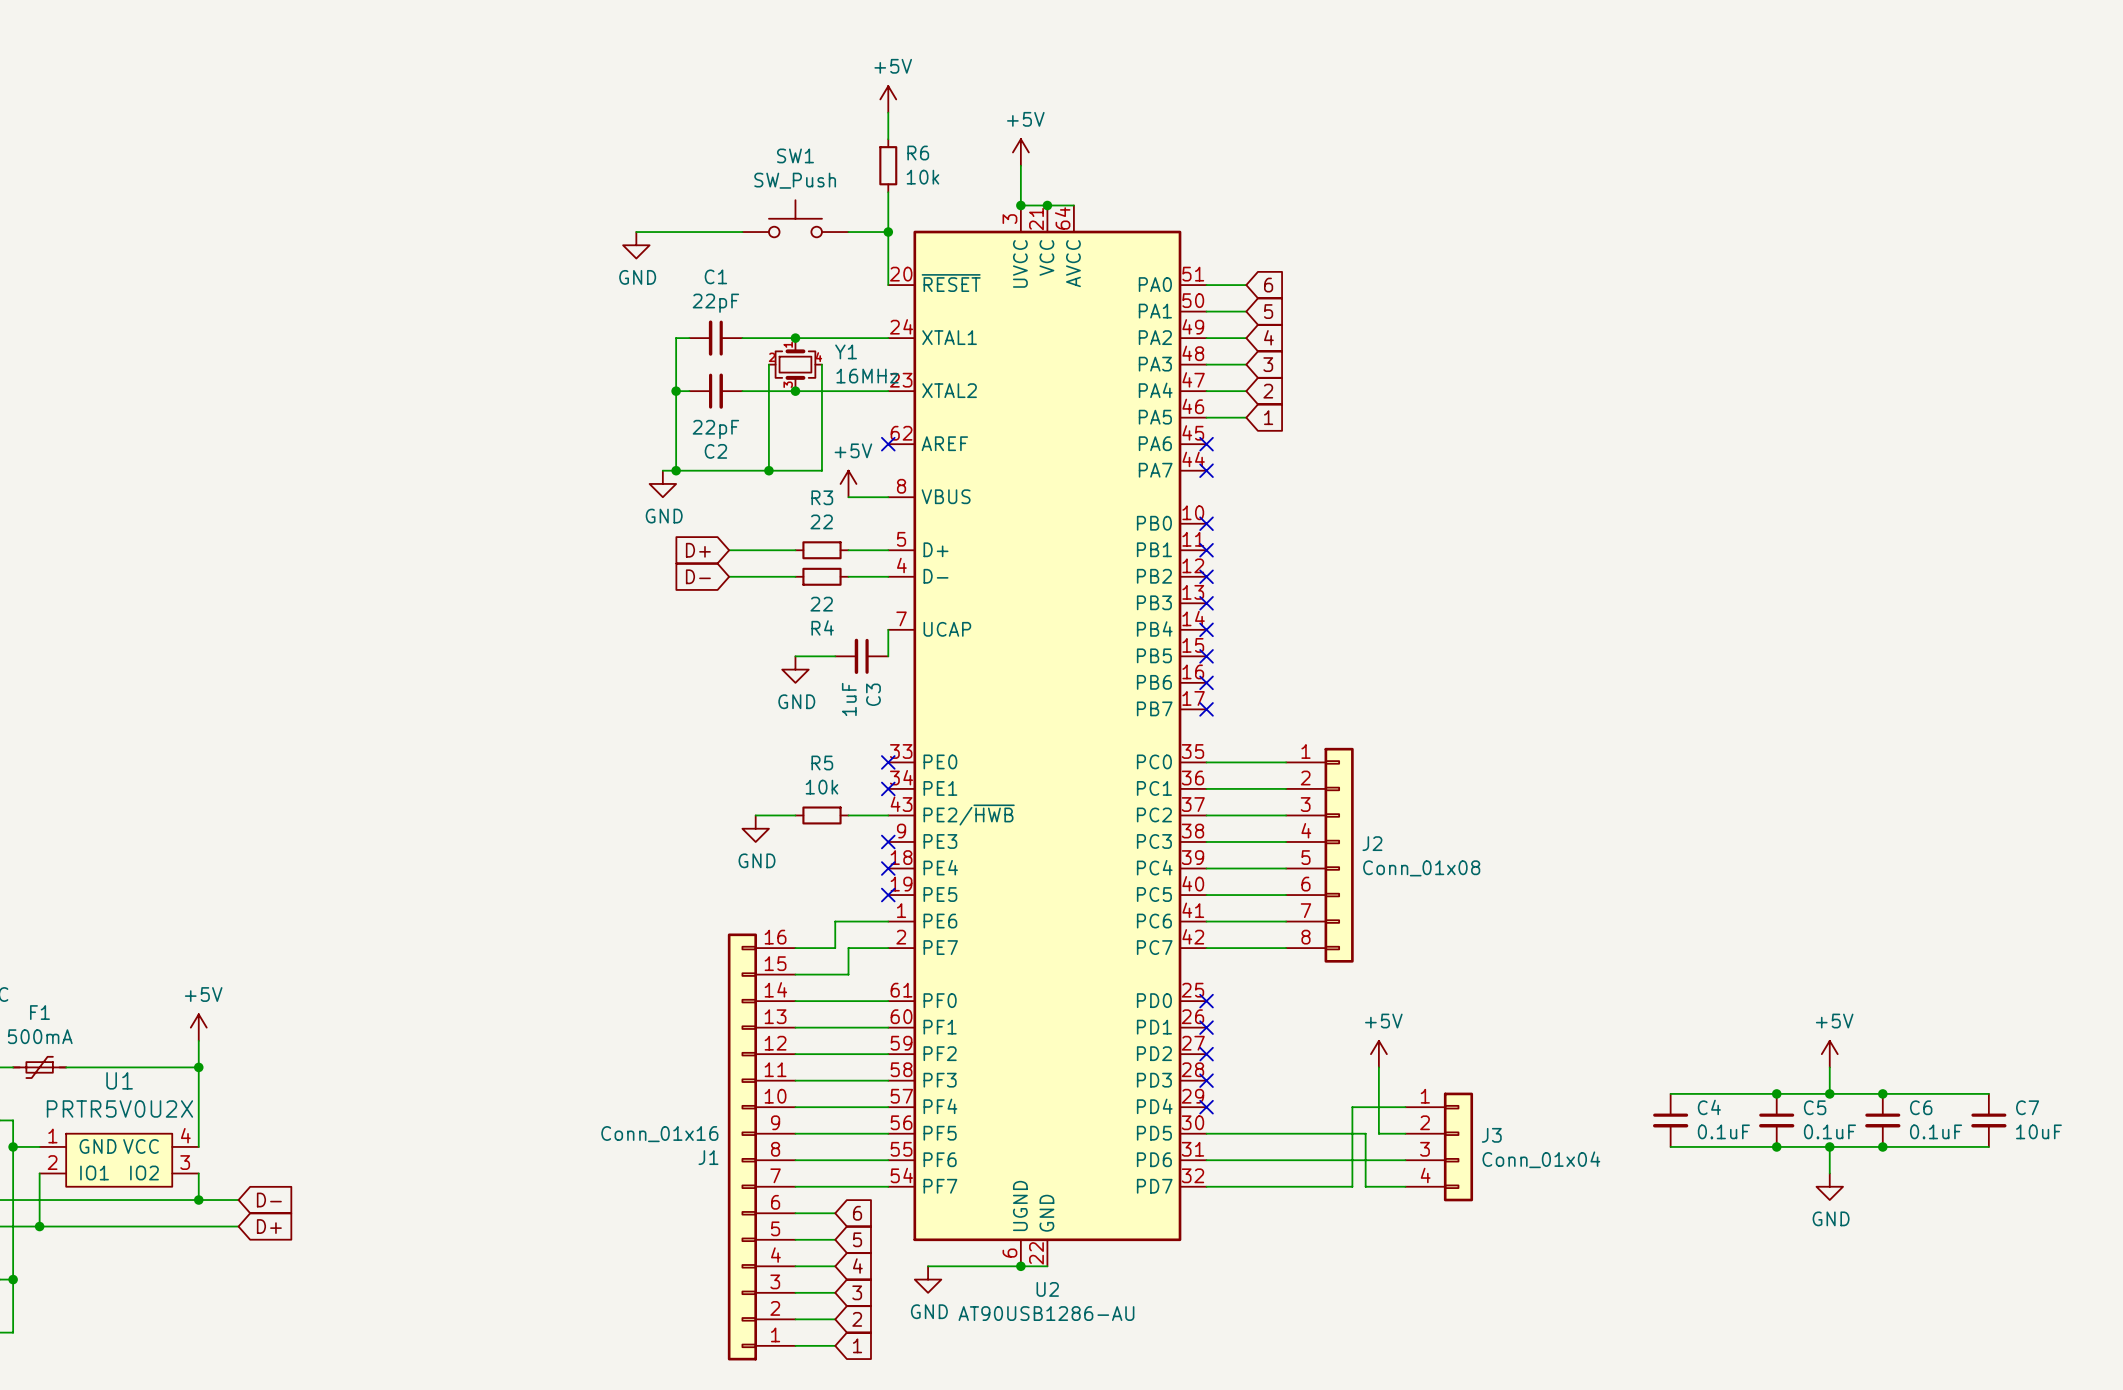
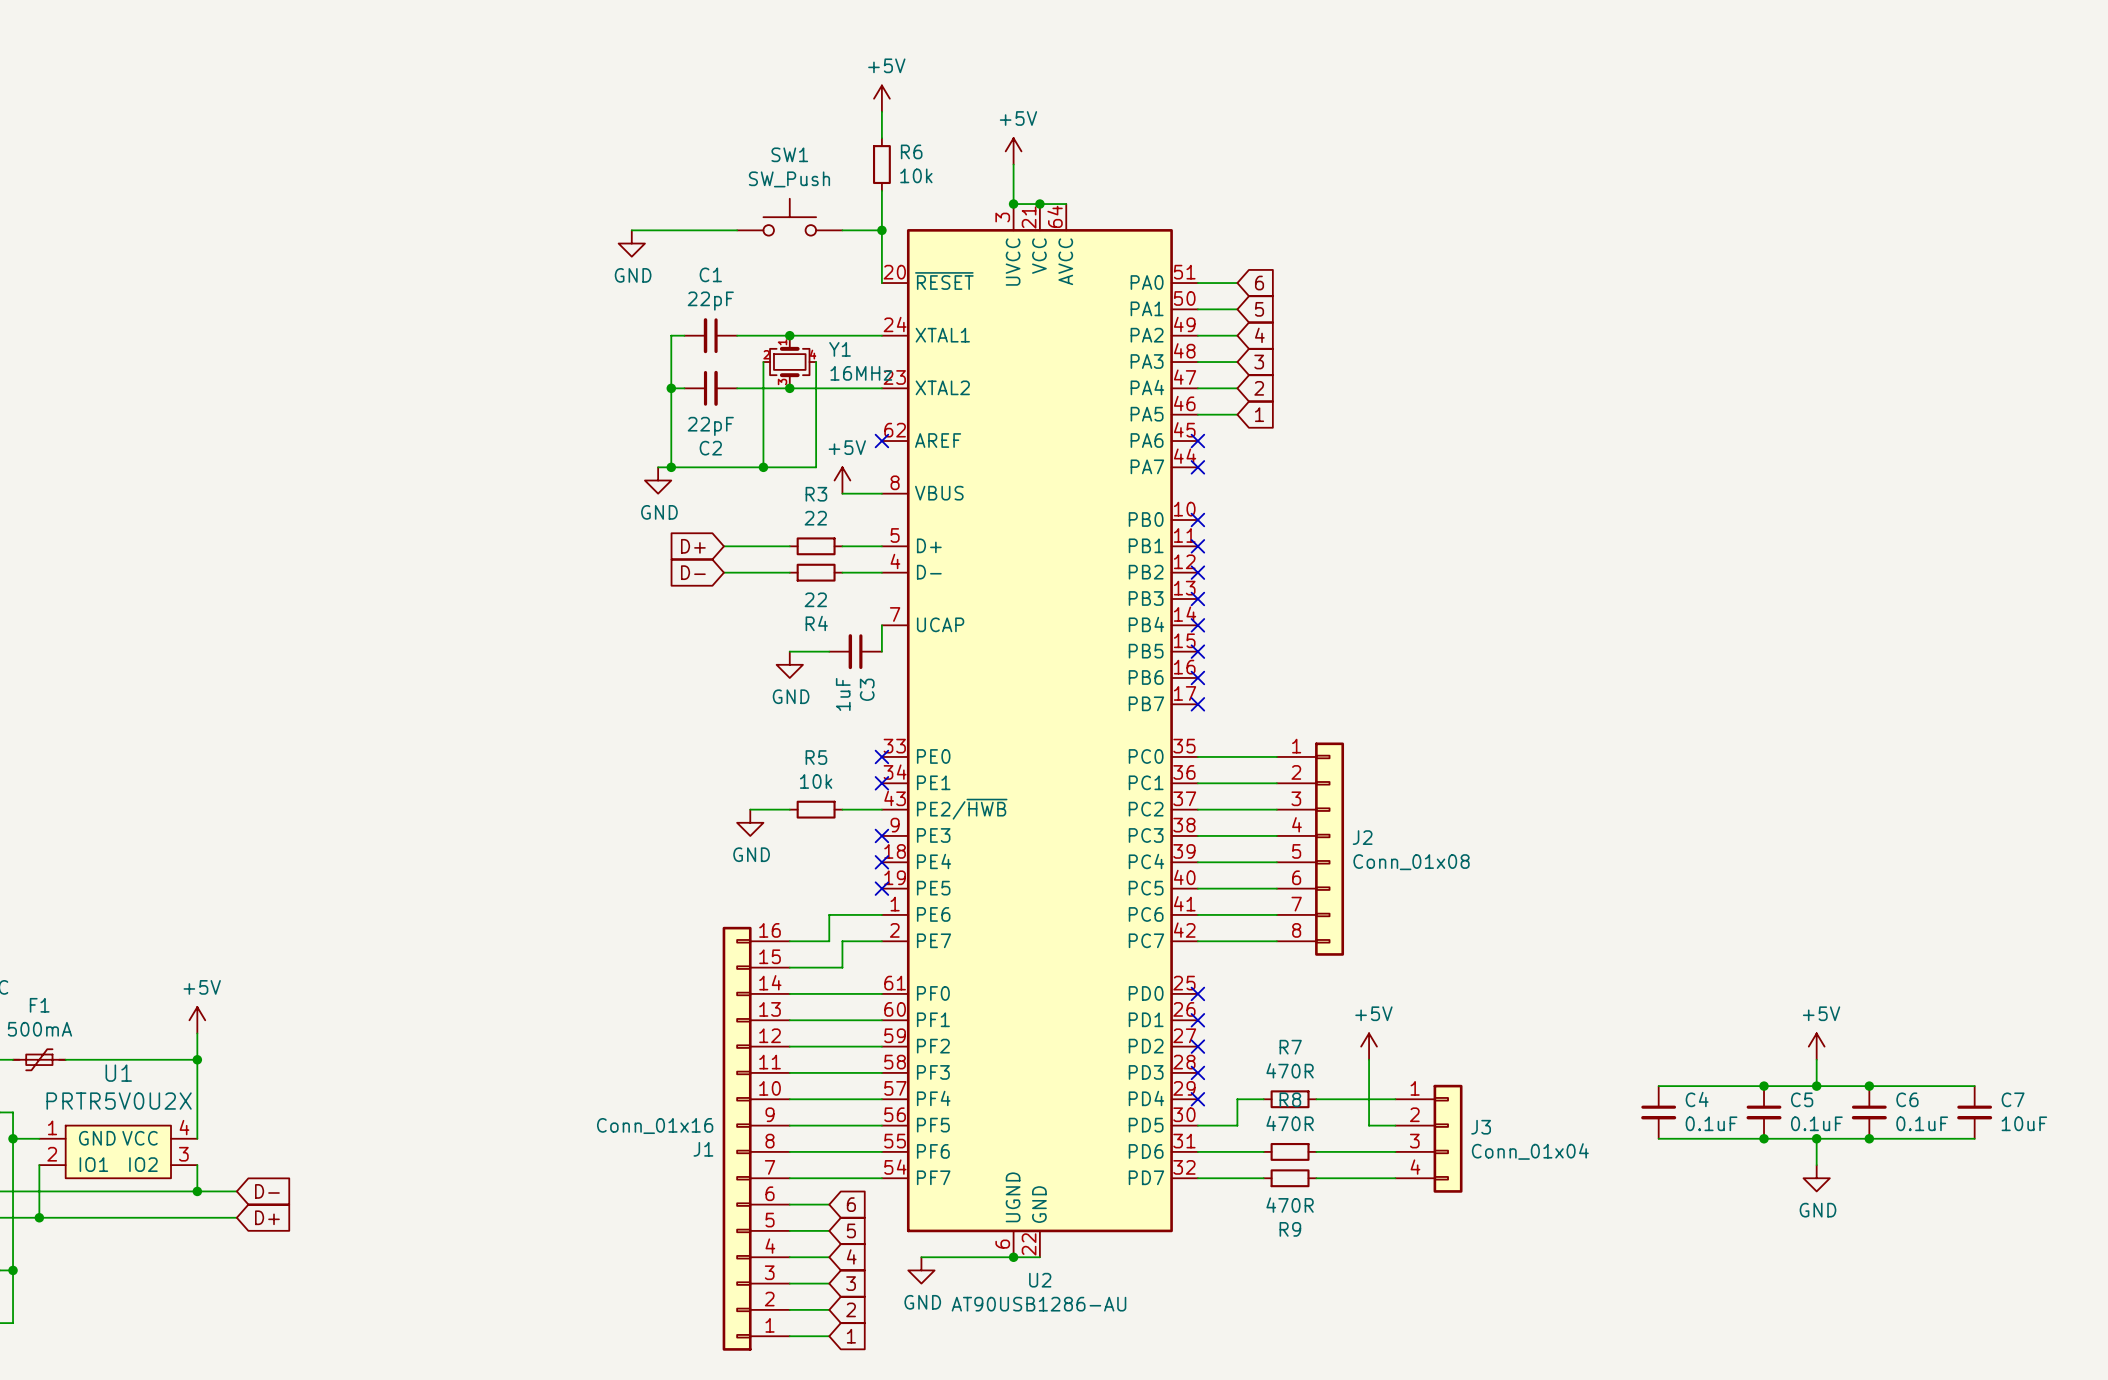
R7: none -> 470R (1290, 1099)
wire: none -> (1316, 1099) (1342, 1099)
wire: (1352, 1107) (1352, 1186) -> (1355, 1178) (1342, 1178)
wire: (1246, 1133) (1365, 1133) (1365, 1186) -> (1237, 1125) (1237, 1099) (1263, 1099)
wire: (1272, 1160) (1325, 1160) -> none
R8: none -> 470R (1290, 1151)
wire: (1272, 1186) (1325, 1186) -> none
R9: none -> 470R (1290, 1178)

